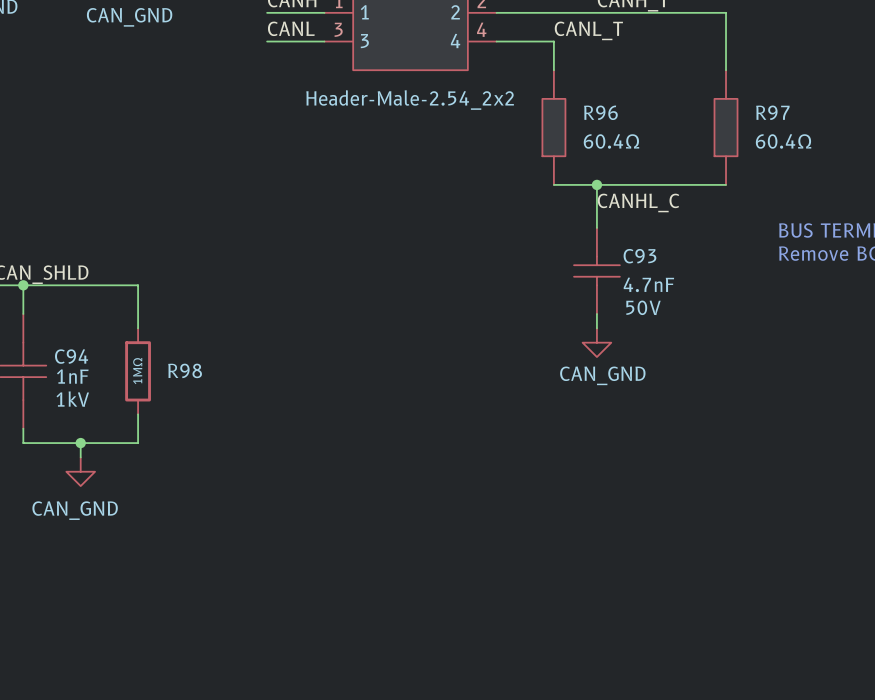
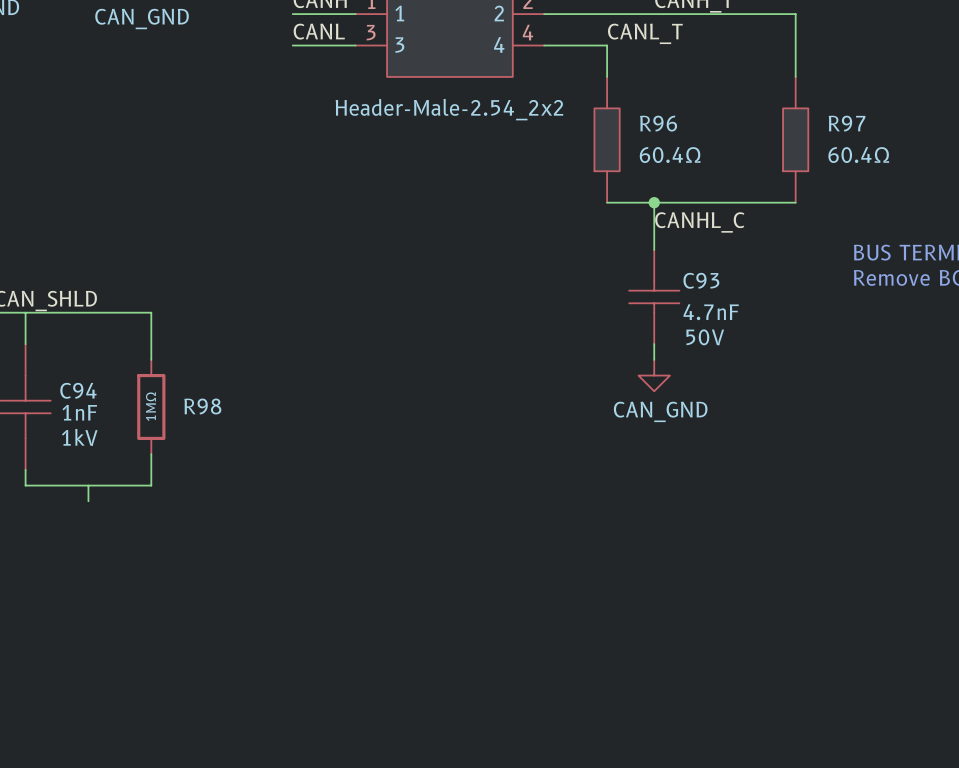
junction: (23, 285) -> none
junction: (80, 443) -> none
power symbol: CAN_GND (80, 471) -> none

